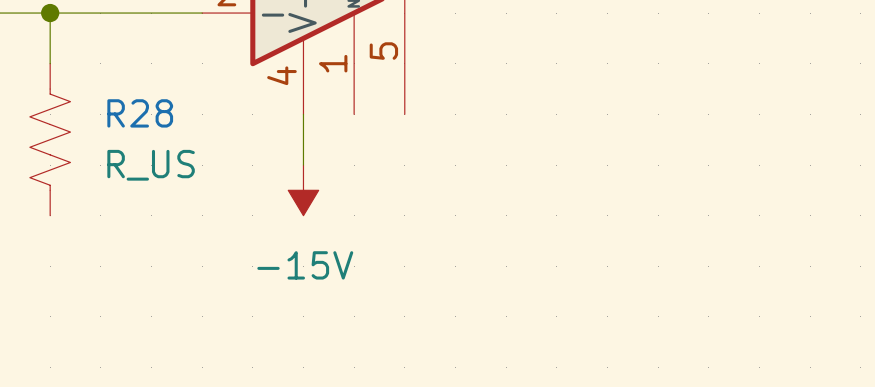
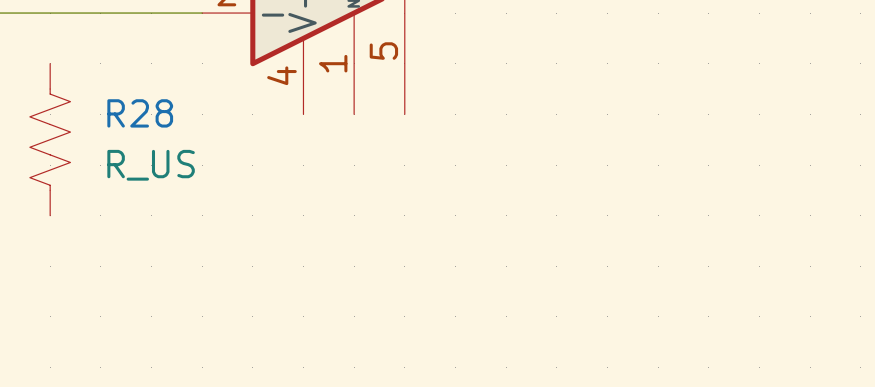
wire: (50, 13) (50, 63) -> none
junction: (50, 13) -> none
wire: (303, 114) (303, 165) -> none
power symbol: -15V (303, 190) -> none

